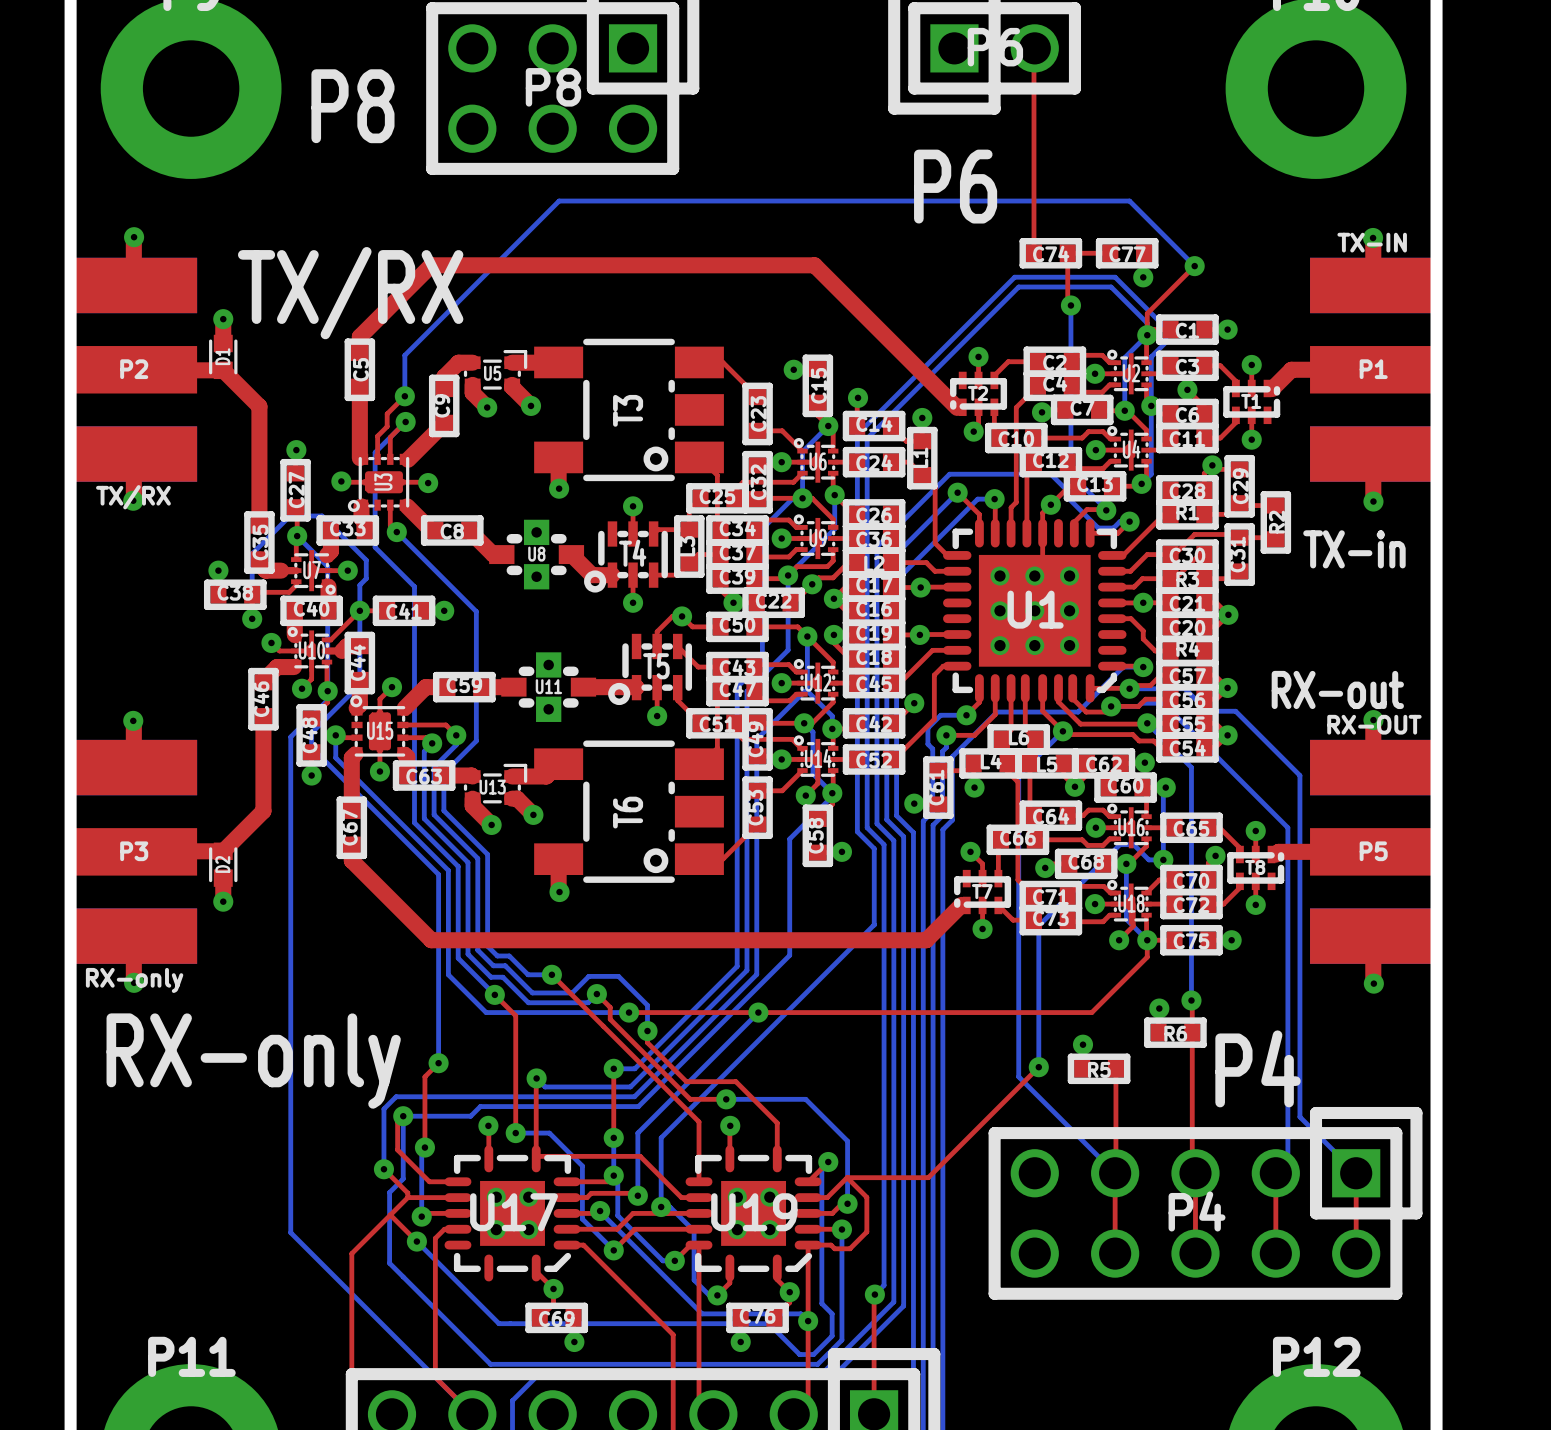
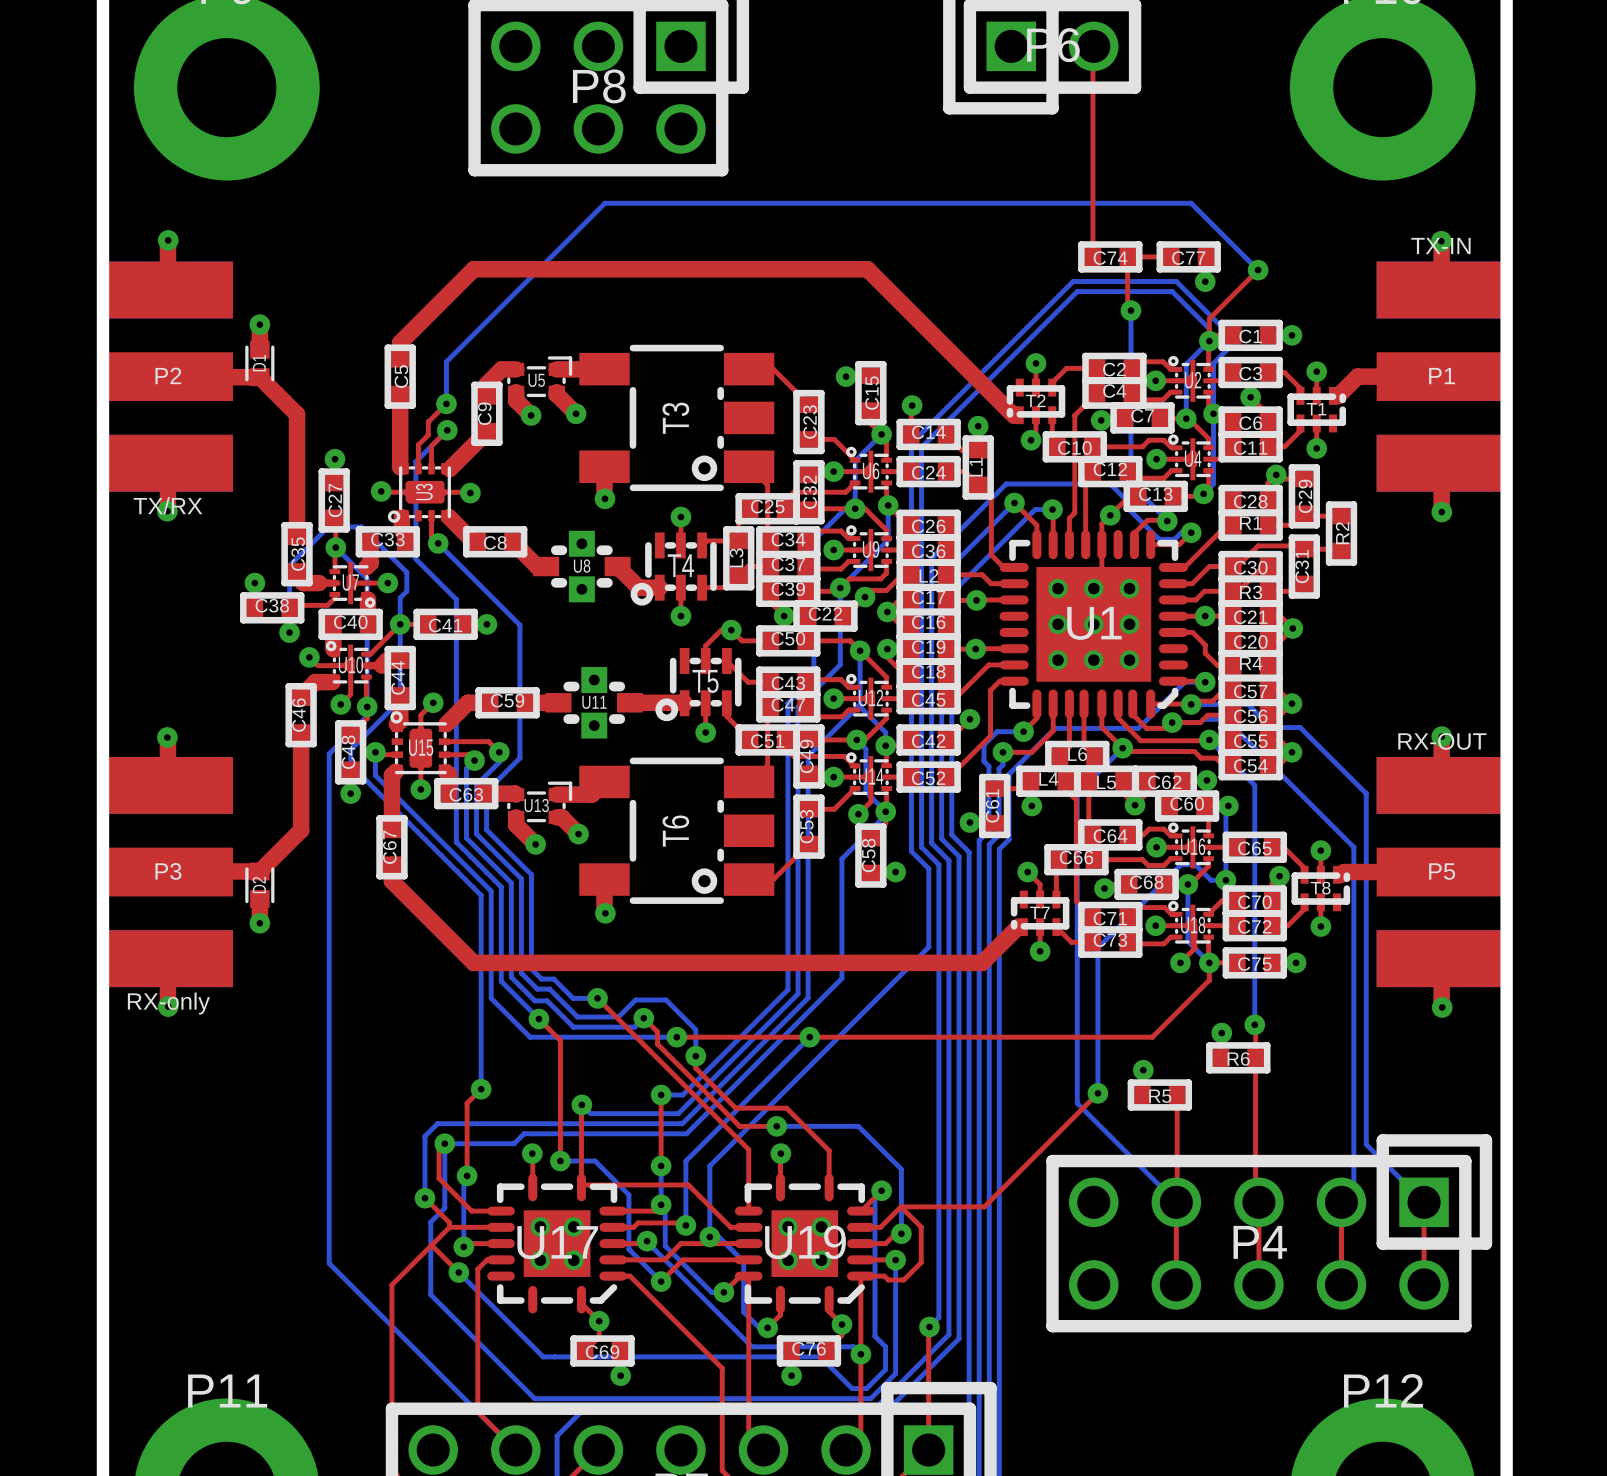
text: P8 (352, 106) -> none
text: P6 (955, 186) -> none
text: TX/RX (350, 293) -> none
text: TX-in (1354, 549) -> none
text: RX-out (1337, 689) -> none
text: RX-only (253, 1061) -> none
text: P4 (1258, 1068) -> none

